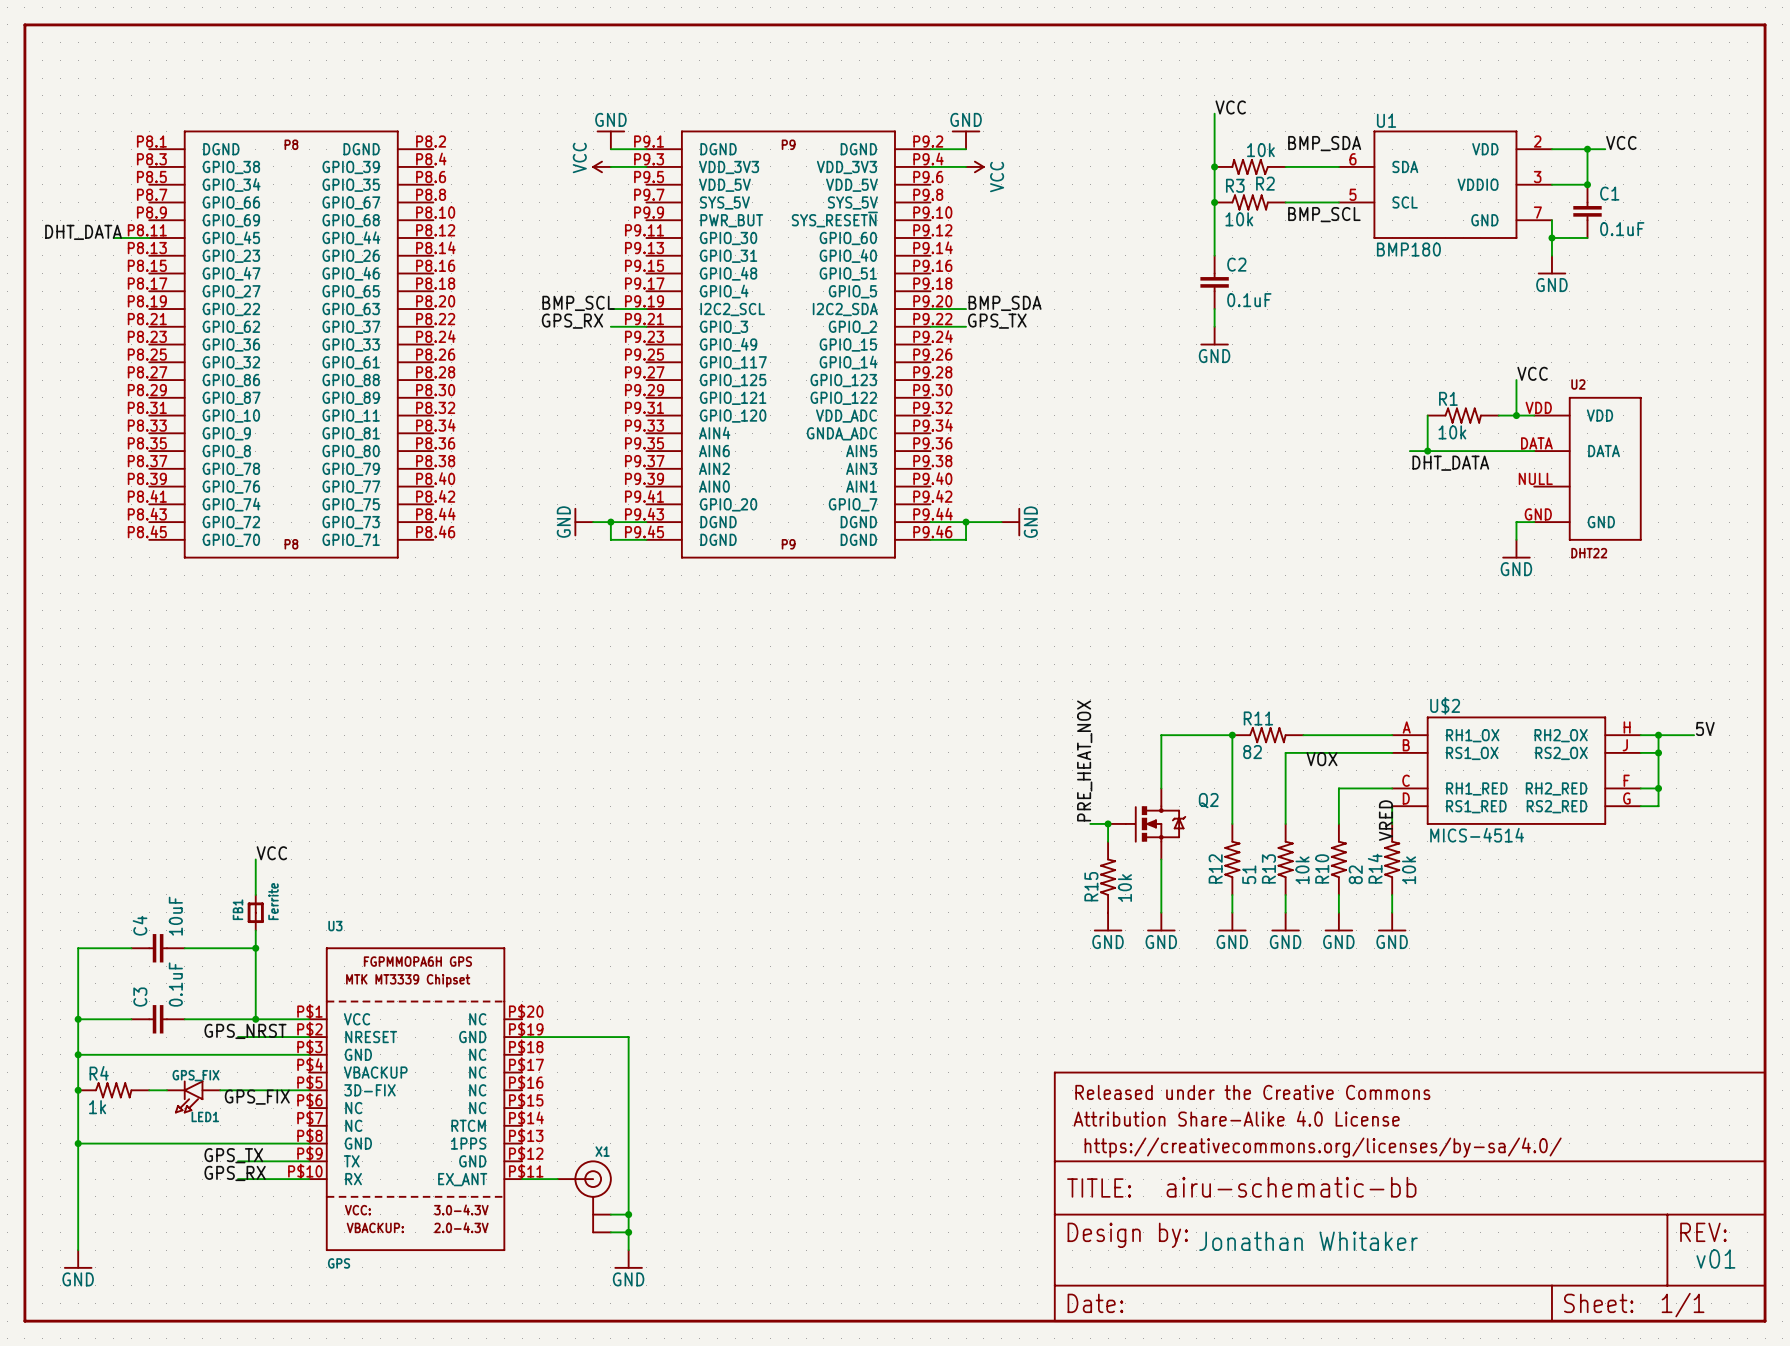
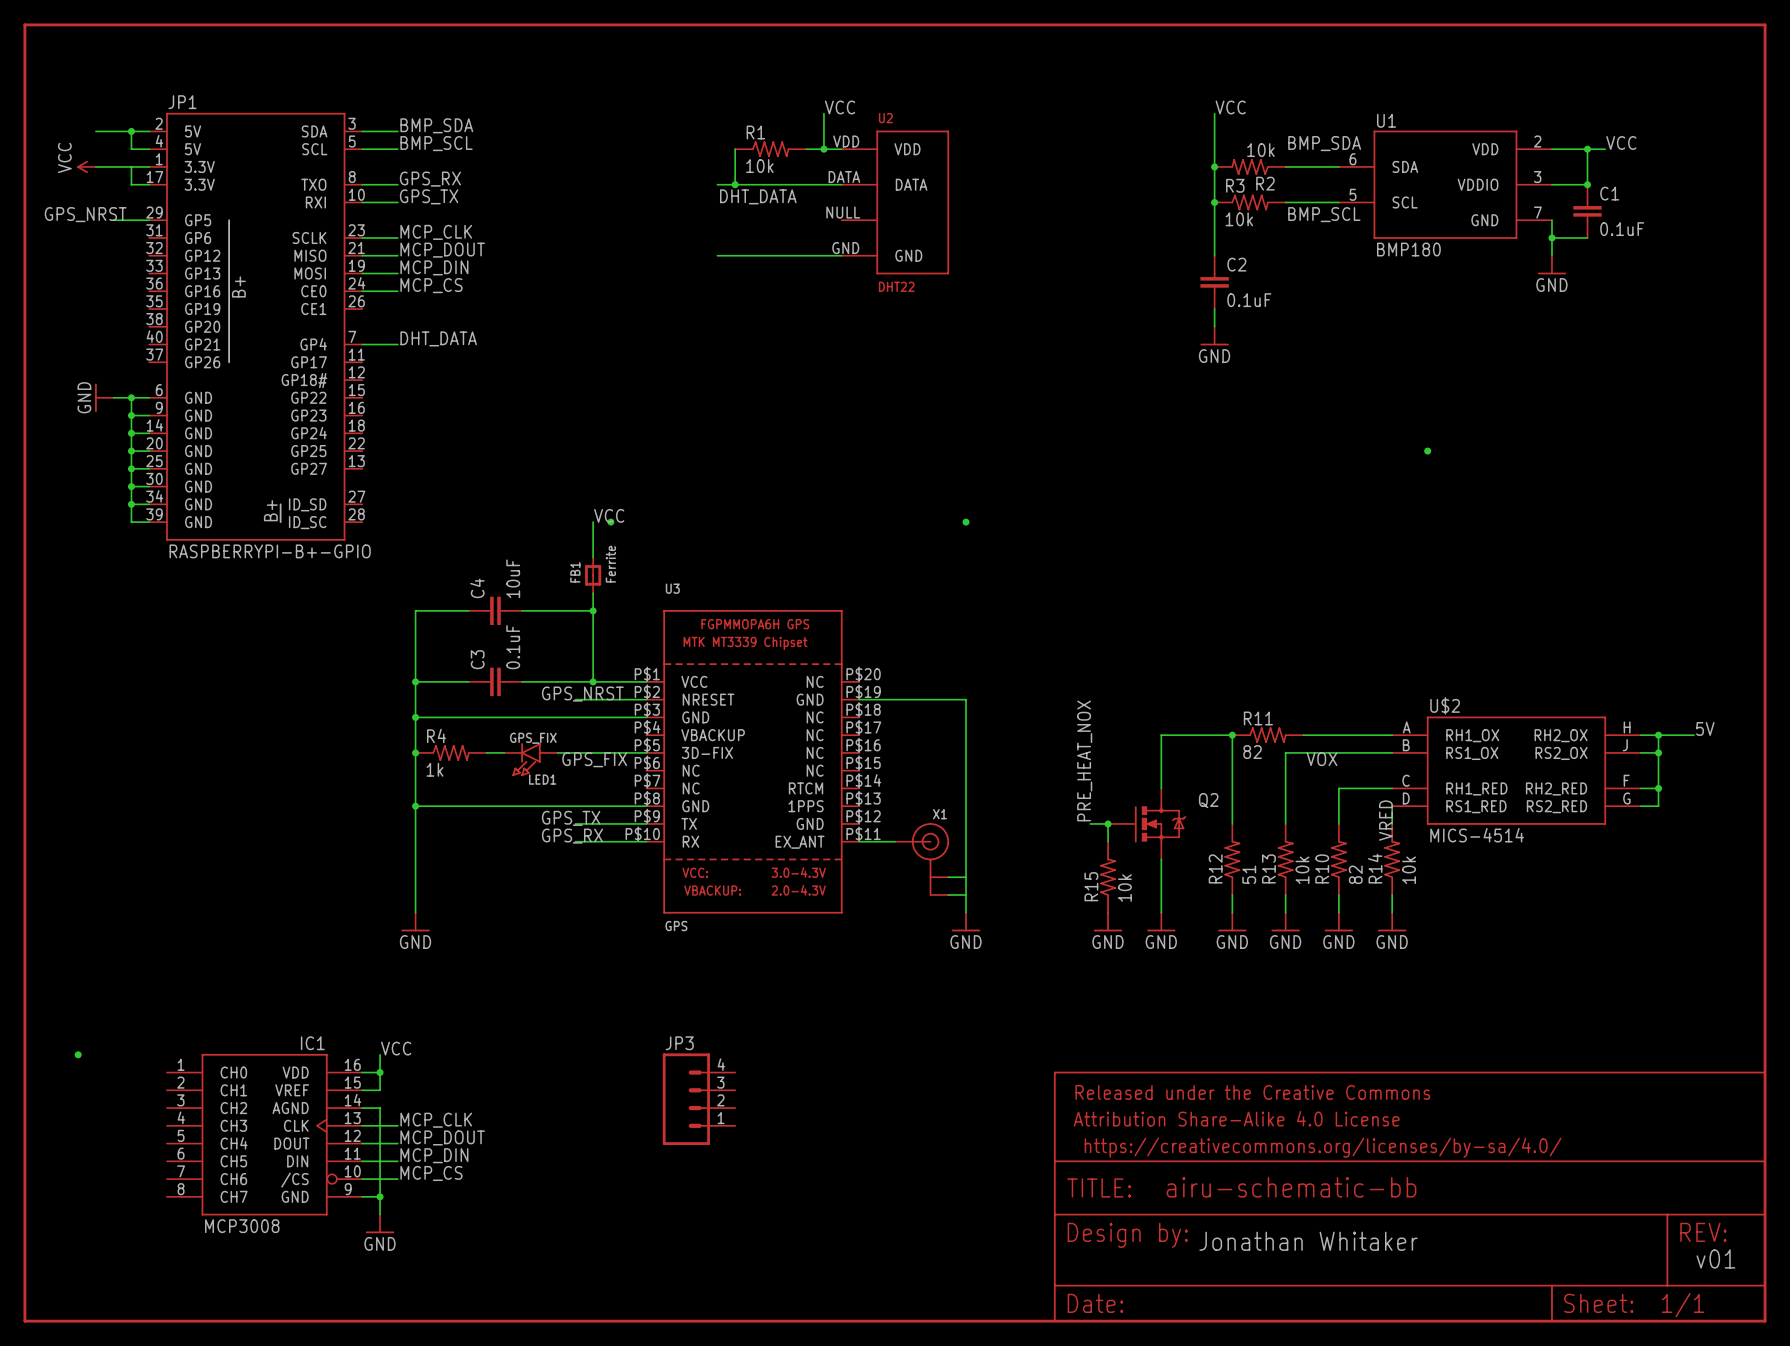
label: none -> VCC (840, 107)
wire: none -> (823, 113) (823, 149)
label: none -> BMP_SDA (436, 125)
wire: none -> (95, 131) (149, 131)
wire: none -> (131, 131) (131, 149) (149, 149)
junction: none -> (131, 131)
power symbol: GND (610, 139) -> none
power symbol: GND (966, 139) -> none
label: none -> BMP_SCL (436, 143)
wire: none -> (362, 149) (397, 149)
wire: (610, 149) (646, 149) -> none
wire: none -> (735, 149) (735, 184)
junction: none -> (823, 149)
wire: (930, 149) (966, 149) -> (806, 149) (841, 149)
power symbol: none -> VCC (86, 166)
wire: none -> (95, 166) (149, 166)
wire: none -> (131, 166) (131, 184) (149, 184)
power symbol: VCC (601, 166) -> none
wire: (610, 166) (646, 166) -> none
wire: (930, 166) (966, 166) -> none
power symbol: VCC (975, 166) -> none
label: none -> GPS_RX (430, 179)
wire: none -> (362, 184) (397, 184)
wire: none -> (717, 184) (841, 184)
junction: none -> (735, 184)
label: none -> GPS_TX (429, 196)
label: none -> DHT_DATA (758, 196)
wire: none -> (362, 202) (397, 202)
label: none -> GPS_NRST (85, 214)
label: DHT_DATA (83, 232) -> none
label: none -> MCP_CLK (436, 232)
wire: (113, 237) (149, 237) -> (113, 220) (149, 220)
wire: none -> (362, 237) (397, 237)
label: none -> MCP_DOUT (442, 250)
wire: none -> (362, 255) (397, 255)
wire: none -> (717, 255) (841, 255)
label: none -> MCP_DIN (434, 267)
wire: none -> (362, 273) (397, 273)
label: none -> MCP_CS (431, 285)
wire: none -> (362, 291) (397, 291)
label: BMP_SCL (578, 303) -> none
label: BMP_SDA (1005, 303) -> none
wire: (610, 309) (646, 309) -> none
wire: (930, 309) (966, 309) -> none
label: GPS_RX (572, 321) -> none
label: GPS_TX (997, 321) -> none
JP1: none -> RASPBERRYPI-B+-GPIO (255, 326)
wire: (610, 326) (646, 326) -> none
wire: (930, 326) (966, 326) -> none
label: none -> DHT_DATA (438, 338)
part: (291, 344) -> none
wire: none -> (362, 344) (397, 344)
part: (788, 344) -> none
label: VCC (1532, 373) -> none
wire: (1516, 380) (1516, 415) -> none
power symbol: none -> GND (104, 397)
wire: none -> (113, 397) (149, 397)
wire: none -> (131, 397) (131, 522) (149, 522)
junction: none -> (131, 397)
wire: none -> (131, 415) (149, 415)
junction: none -> (131, 415)
wire: (1427, 415) (1427, 451) -> none
R1 position: (1463, 415) -> (770, 149)
wire: (1498, 415) (1534, 415) -> none
junction: (1516, 415) -> none
wire: none -> (131, 433) (149, 433)
junction: none -> (131, 433)
wire: none -> (131, 451) (149, 451)
junction: none -> (131, 451)
wire: (1409, 451) (1534, 451) -> none
label: DHT_DATA (1450, 463) -> none
wire: none -> (131, 468) (149, 468)
junction: none -> (131, 468)
U2 position: (1587, 468) -> (895, 202)
wire: none -> (131, 486) (149, 486)
junction: none -> (131, 486)
wire: none -> (131, 504) (149, 504)
junction: none -> (131, 504)
label: none -> VCC (609, 515)
power symbol: GND (583, 522) -> none
wire: (593, 522) (646, 522) -> (593, 522) (593, 557)
wire: (610, 522) (610, 539) (646, 539) -> none
wire: (930, 522) (1001, 522) -> none
wire: (966, 522) (966, 539) (930, 539) -> none
power symbol: GND (1010, 522) -> none
wire: (1534, 522) (1516, 522) (1516, 539) -> none
power symbol: GND (1516, 549) -> none
wire: none -> (593, 593) (593, 681)
wire: none -> (468, 610) (415, 610) (415, 912)
wire: none -> (522, 610) (593, 610)
junction: none -> (593, 610)
wire: none -> (415, 681) (468, 681)
junction: none -> (415, 681)
wire: none -> (522, 681) (646, 681)
junction: none -> (593, 681)
label: none -> GPS_NRST (582, 694)
wire: none -> (575, 699) (646, 699)
wire: none -> (859, 699) (966, 699) (966, 912)
wire: none -> (415, 717) (646, 717)
junction: none -> (415, 717)
junction: none -> (415, 752)
wire: none -> (486, 752) (504, 752)
wire: none -> (557, 752) (646, 752)
label: none -> GPS_FIX (594, 759)
wire: none -> (415, 806) (646, 806)
junction: none -> (415, 806)
label: none -> GPS_TX (571, 818)
wire: none -> (575, 823) (646, 823)
label: none -> GPS_RX (572, 836)
wire: none -> (575, 841) (646, 841)
wire: none -> (859, 841) (894, 841)
label: VCC (271, 853) -> none
wire: (255, 859) (255, 894) -> none
wire: none -> (948, 877) (966, 877)
wire: none -> (948, 894) (966, 894)
FB1 position: (255, 912) -> (593, 575)
power symbol: none -> GND (415, 922)
power symbol: none -> GND (966, 922)
wire: (255, 930) (255, 1019) -> none
wire: (131, 948) (78, 948) (78, 1250) -> none
C4 position: (158, 948) -> (495, 610)
wire: (184, 948) (255, 948) -> none
junction: (255, 948) -> none
wire: (78, 1019) (131, 1019) -> none
junction: (78, 1019) -> none
C3 position: (158, 1019) -> (495, 681)
wire: (184, 1019) (309, 1019) -> none
junction: (255, 1019) -> none
label: GPS_NRST (245, 1031) -> none
wire: (237, 1037) (309, 1037) -> none
wire: (522, 1037) (628, 1037) (628, 1250) -> none
label: none -> VCC (396, 1048)
wire: (78, 1054) (309, 1054) -> none
wire: none -> (380, 1054) (380, 1090) (362, 1090)
wire: none -> (362, 1072) (380, 1072)
junction: none -> (380, 1072)
junction: (78, 1090) -> none
R4 position: (113, 1090) -> (451, 752)
wire: (149, 1090) (166, 1090) -> none
wire: (220, 1090) (309, 1090) -> none
LED1 position: (193, 1096) -> (530, 759)
label: GPS_FIX (257, 1097) -> none
U3 position: (415, 1099) -> (752, 761)
JP3: none -> (698, 1099)
wire: none -> (362, 1108) (380, 1108) (380, 1214)
label: none -> MCP_CLK (436, 1120)
wire: none -> (362, 1125) (397, 1125)
IC1: none -> (264, 1134)
label: none -> MCP_DOUT (442, 1137)
wire: (78, 1143) (309, 1143) -> none
junction: (78, 1143) -> none
wire: none -> (362, 1143) (397, 1143)
label: GPS_TX (233, 1155) -> none
label: none -> MCP_DIN (434, 1155)
wire: (237, 1161) (309, 1161) -> none
wire: none -> (362, 1161) (397, 1161)
label: GPS_RX (235, 1173) -> none
label: none -> MCP_CS (431, 1173)
wire: (237, 1179) (309, 1179) -> none
wire: (522, 1179) (557, 1179) -> (362, 1179) (397, 1179)
junction: none -> (380, 1196)
X1 position: (584, 1196) -> (922, 859)
wire: (610, 1214) (628, 1214) -> none
junction: (628, 1214) -> none
power symbol: none -> GND (380, 1223)
wire: (610, 1232) (628, 1232) -> none
junction: (628, 1232) -> none
power symbol: GND (78, 1259) -> none
power symbol: GND (628, 1259) -> none

